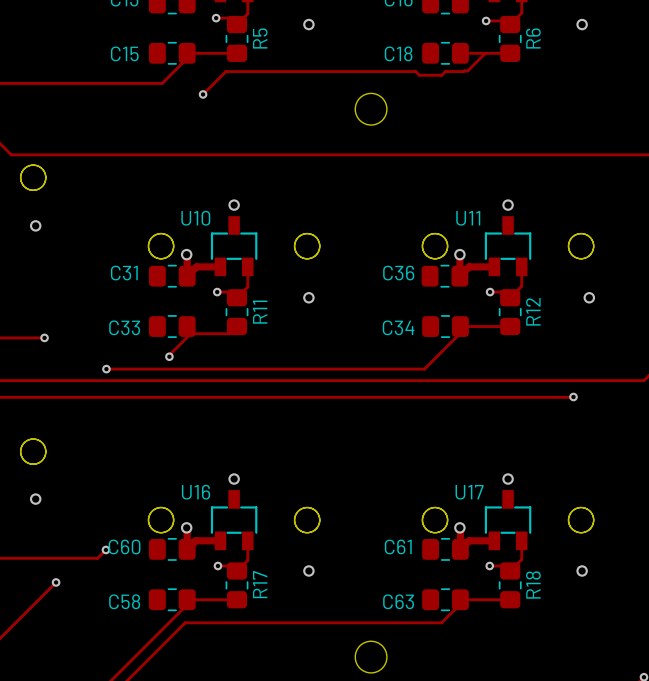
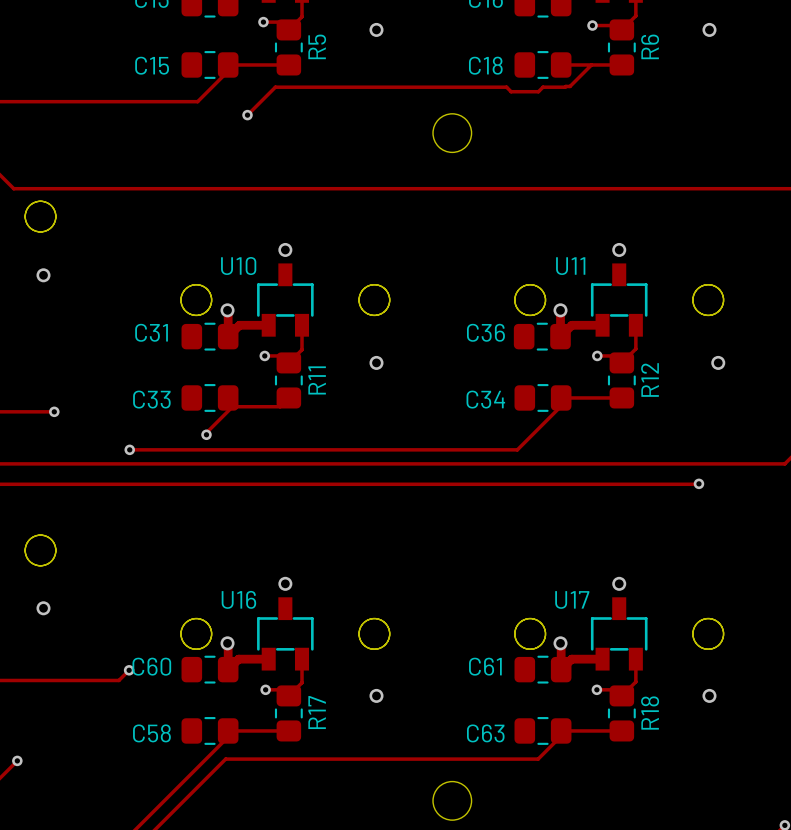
track: (56, 582) (14, 624) -> none
via position: (56, 582) -> (17, 760)

